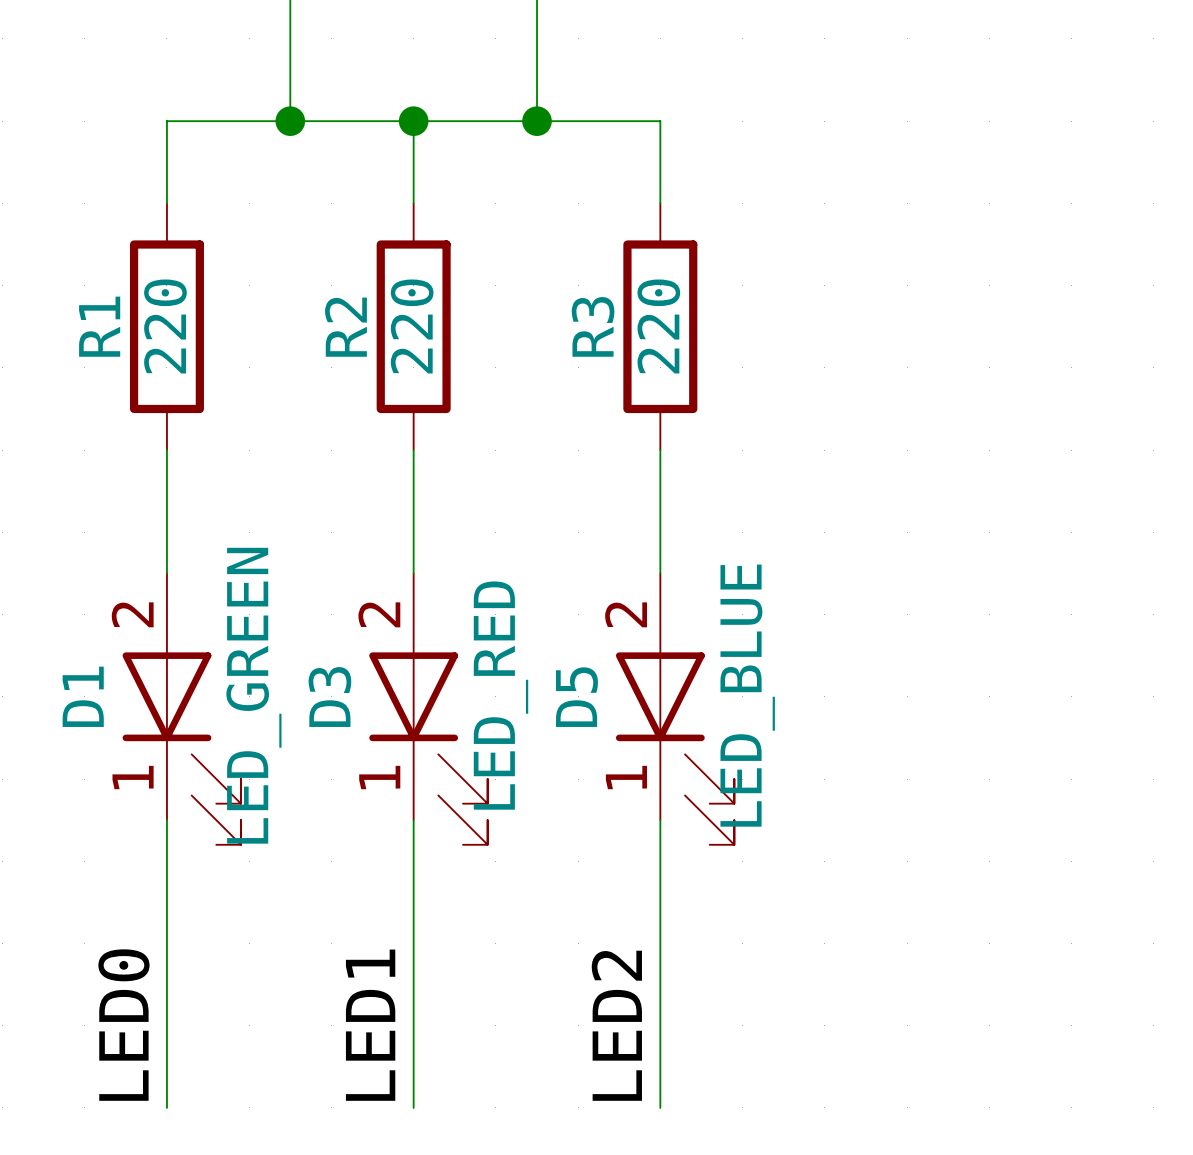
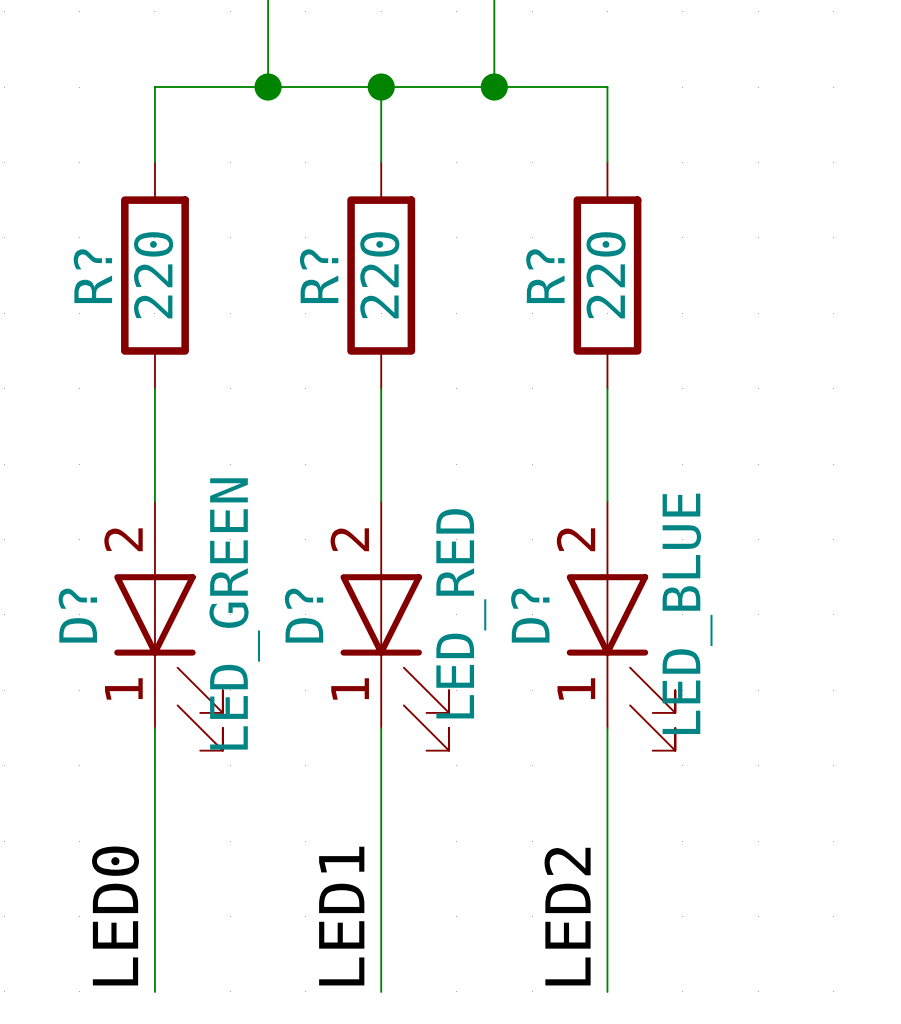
R1 name: R1 (99, 326) -> R? (92, 276)
R3 name: R3 (593, 326) -> R? (545, 276)
R2 name: R2 (345, 327) -> R? (319, 276)
D1 name: D1 (83, 696) -> D? (77, 615)
D3 name: D3 (329, 697) -> D? (304, 615)
D5 name: D5 (576, 697) -> D? (530, 615)

